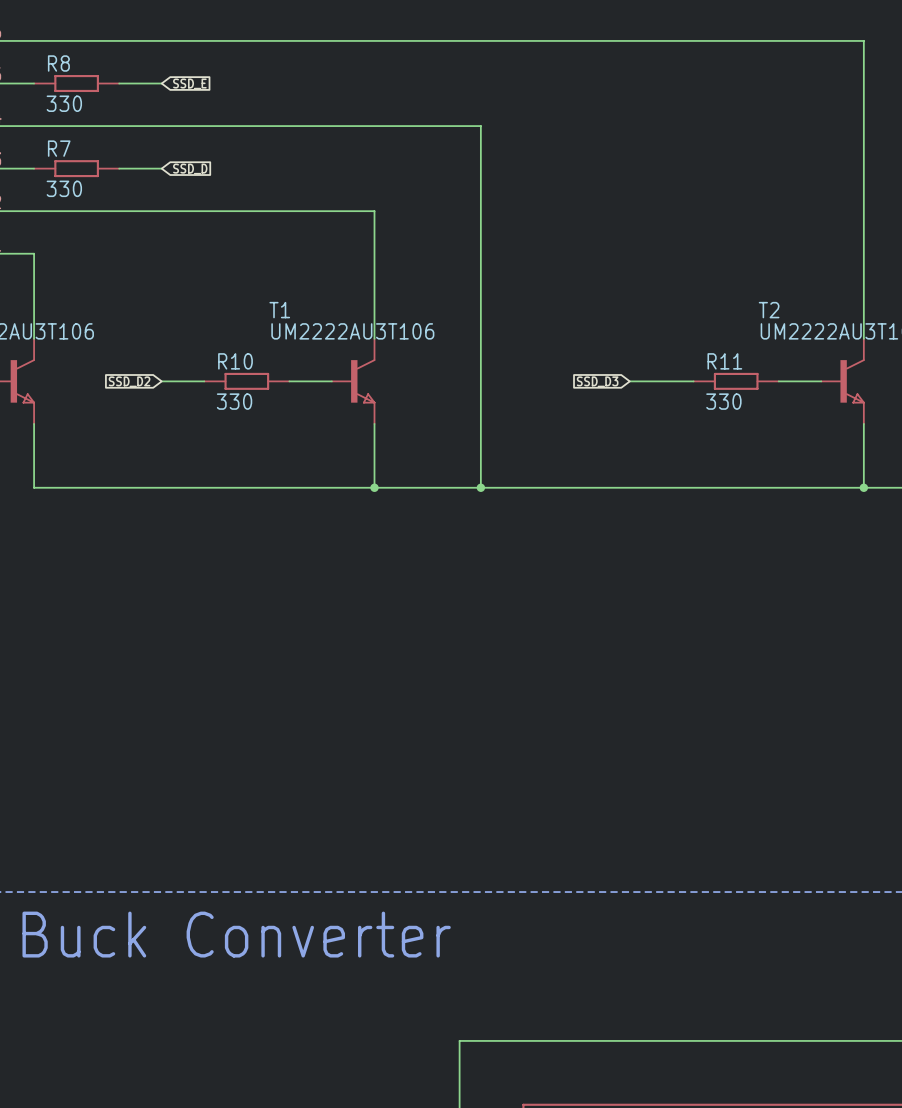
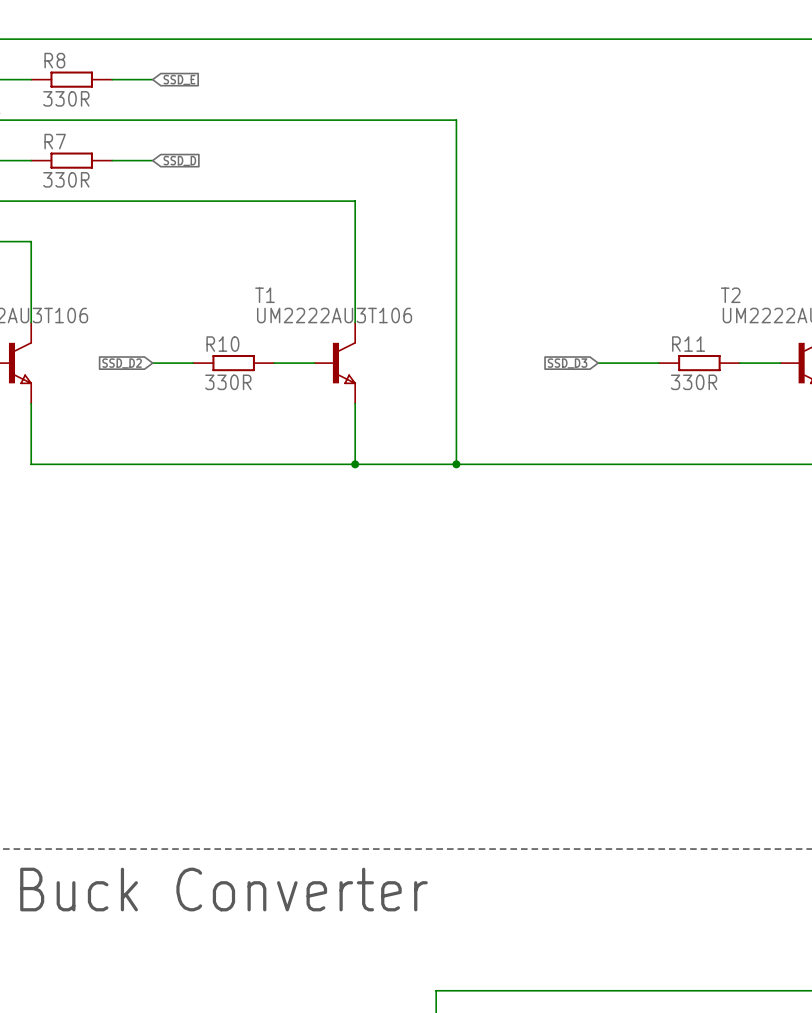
R8 value: 330 (64, 103) -> 330R (66, 98)
R7 value: 330 (64, 188) -> 330R (66, 179)
R10 value: 330 (234, 401) -> 330R (228, 382)
R11 value: 330 (723, 401) -> 330R (694, 382)

